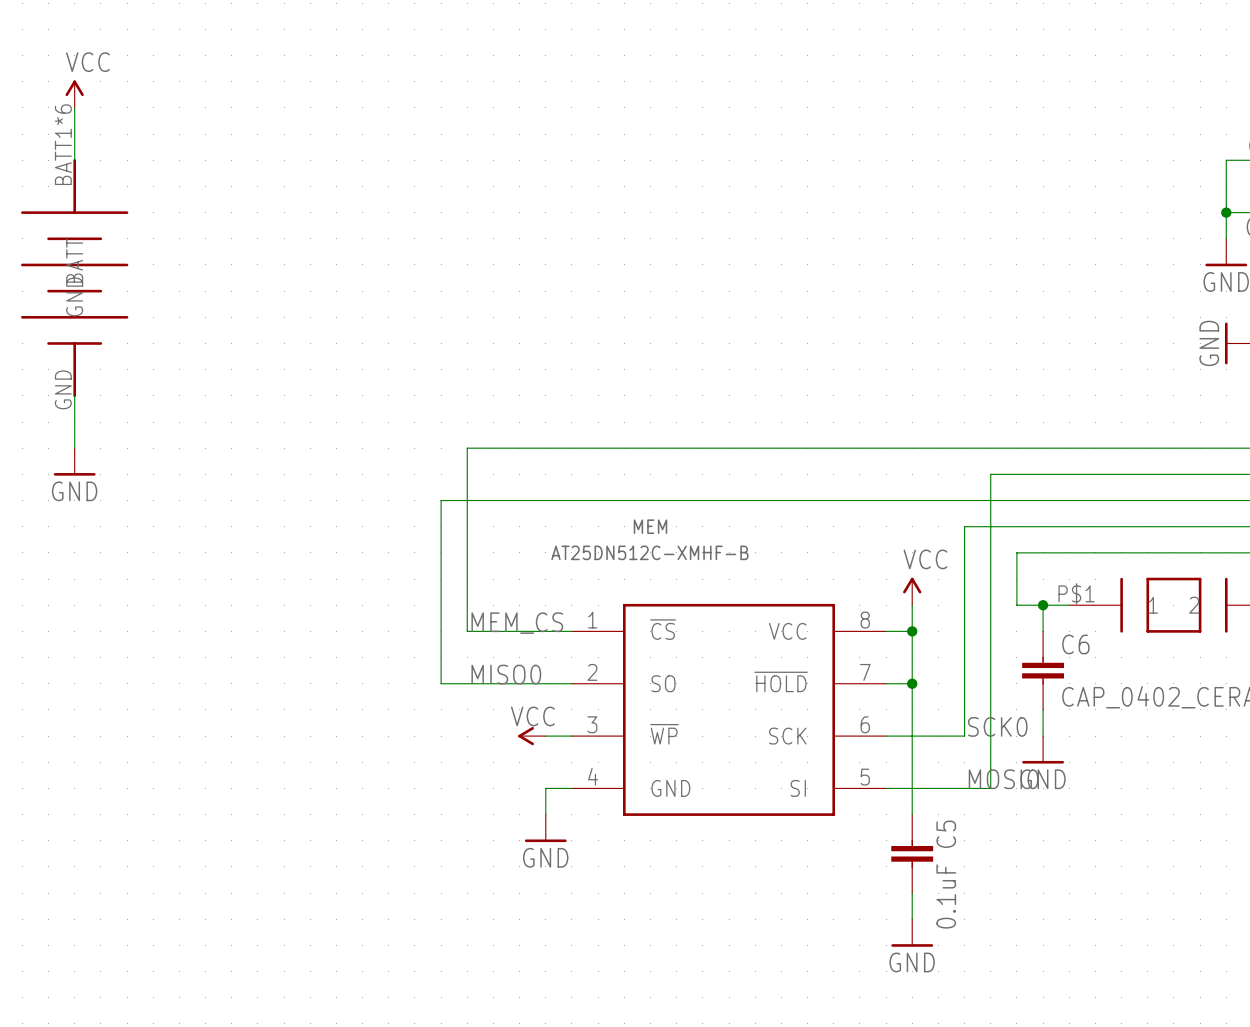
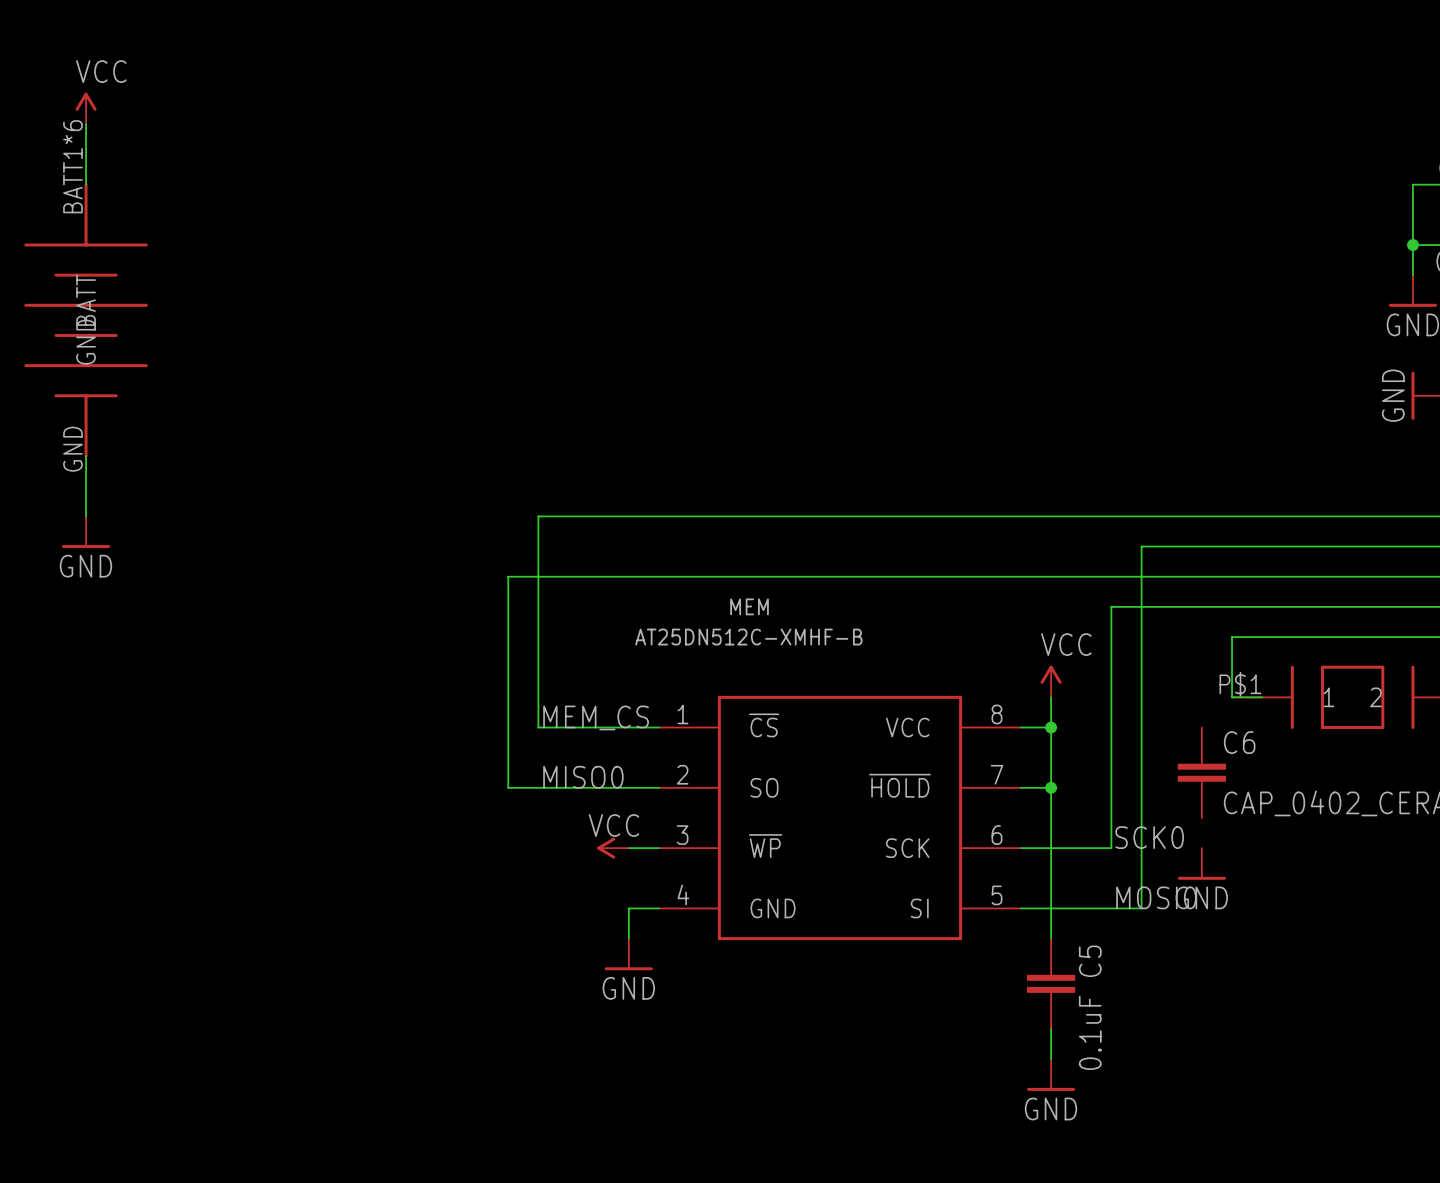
wire: (1069, 552) (1016, 552) (1016, 605) (1069, 605) -> (1232, 637) (1232, 697) (1262, 697)
wire: (1043, 605) (1043, 631) -> none
junction: (1043, 605) -> none
wire: (1043, 709) (1043, 736) -> none

